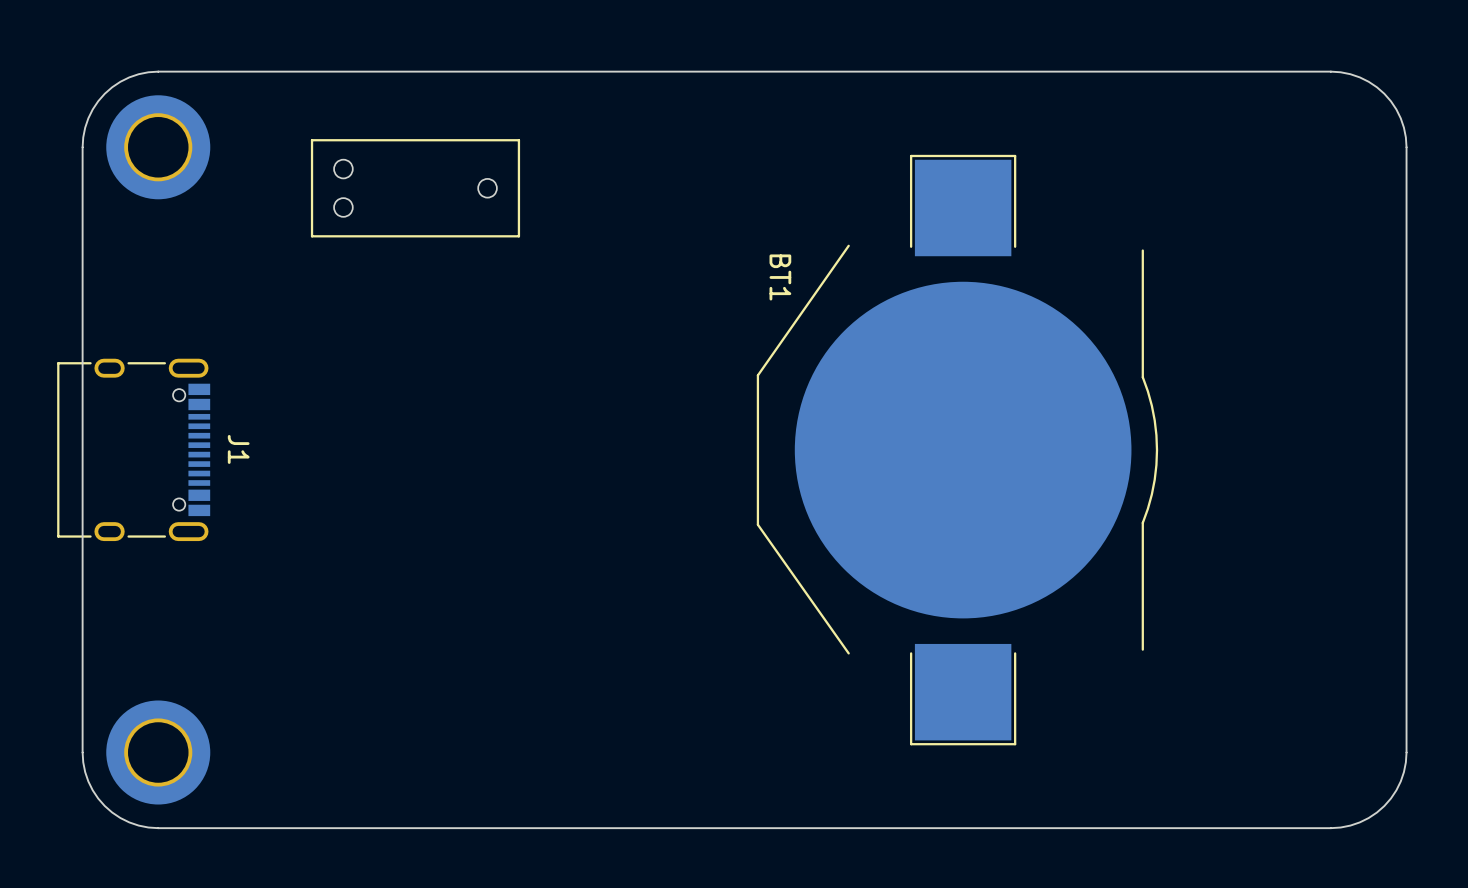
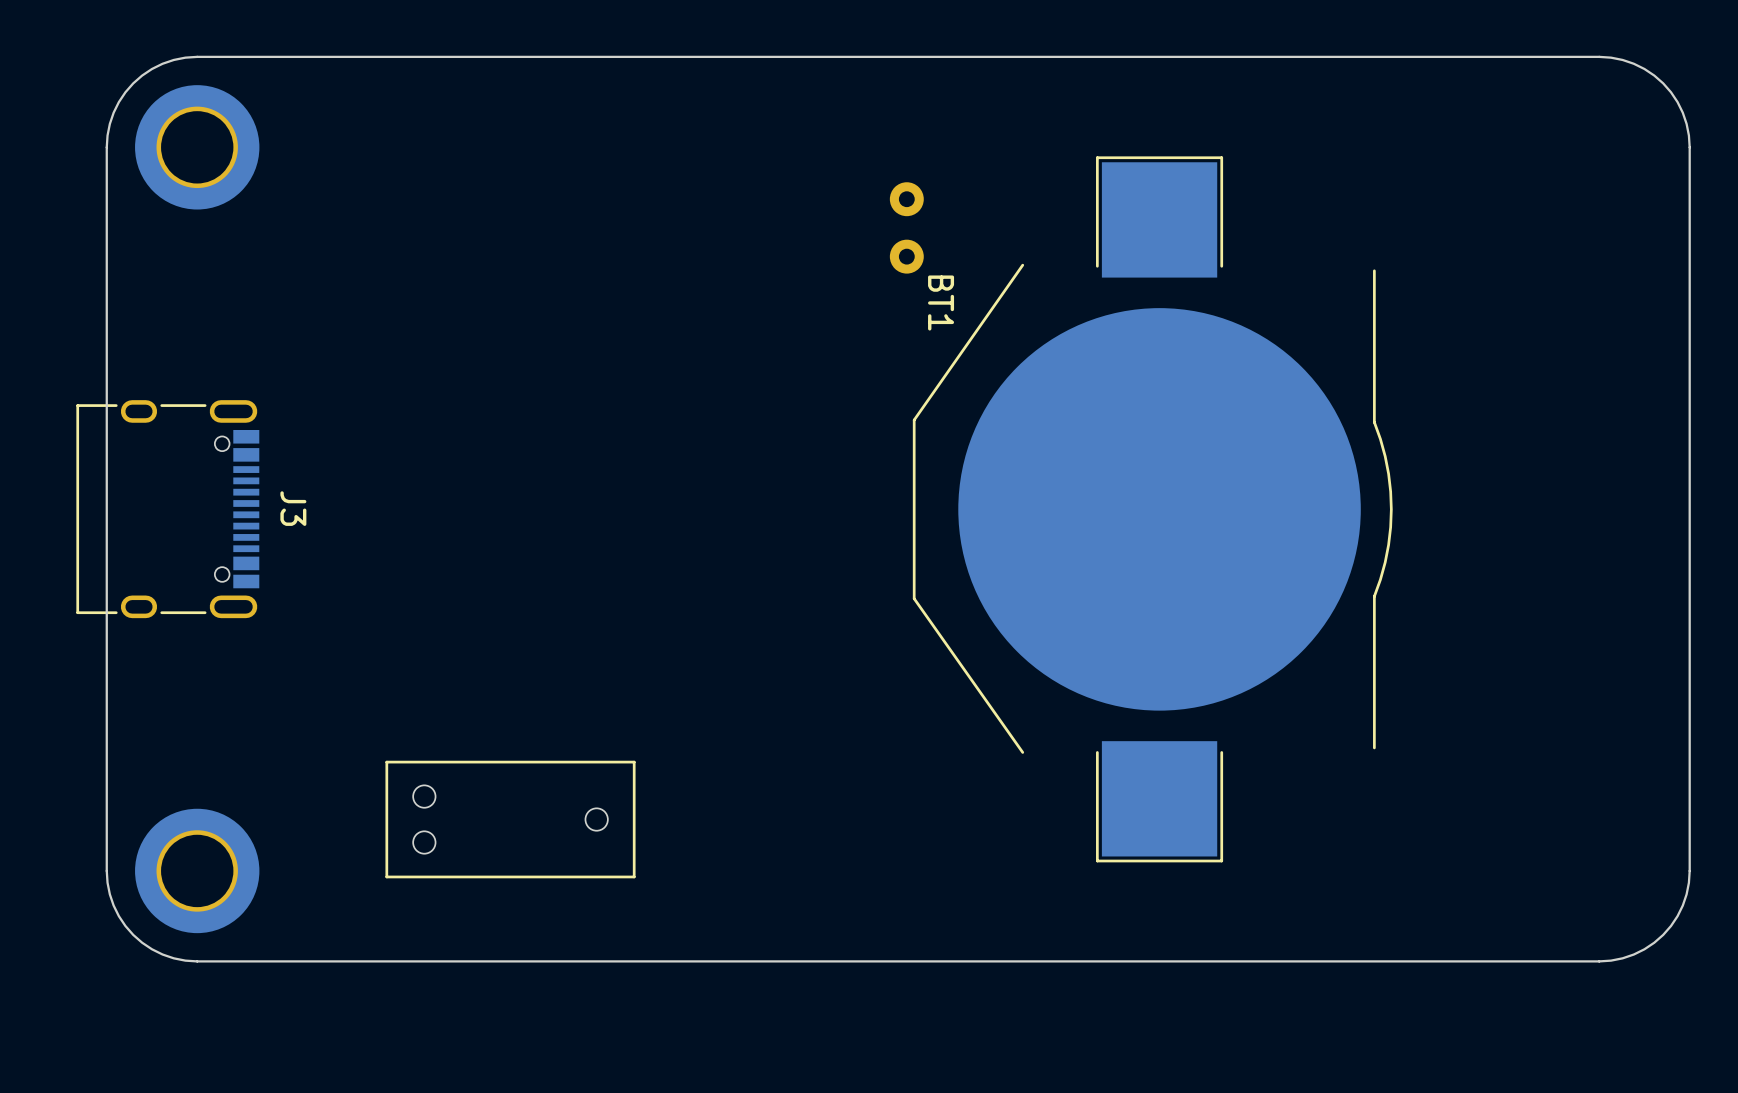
part: (415, 188) -> none
part: none -> (906, 199)
part: none -> (906, 256)
J1 name: J1 (238, 449) -> J3 (293, 508)
part: none -> (510, 819)

